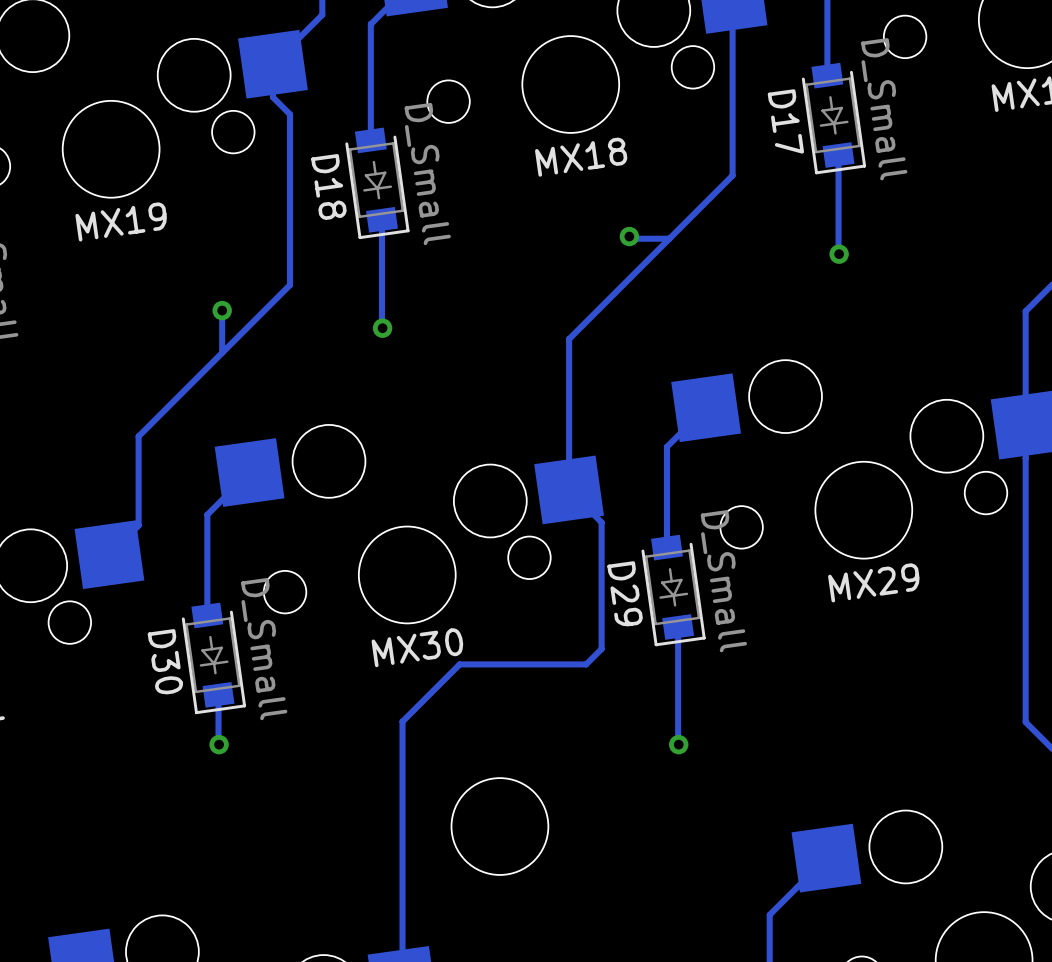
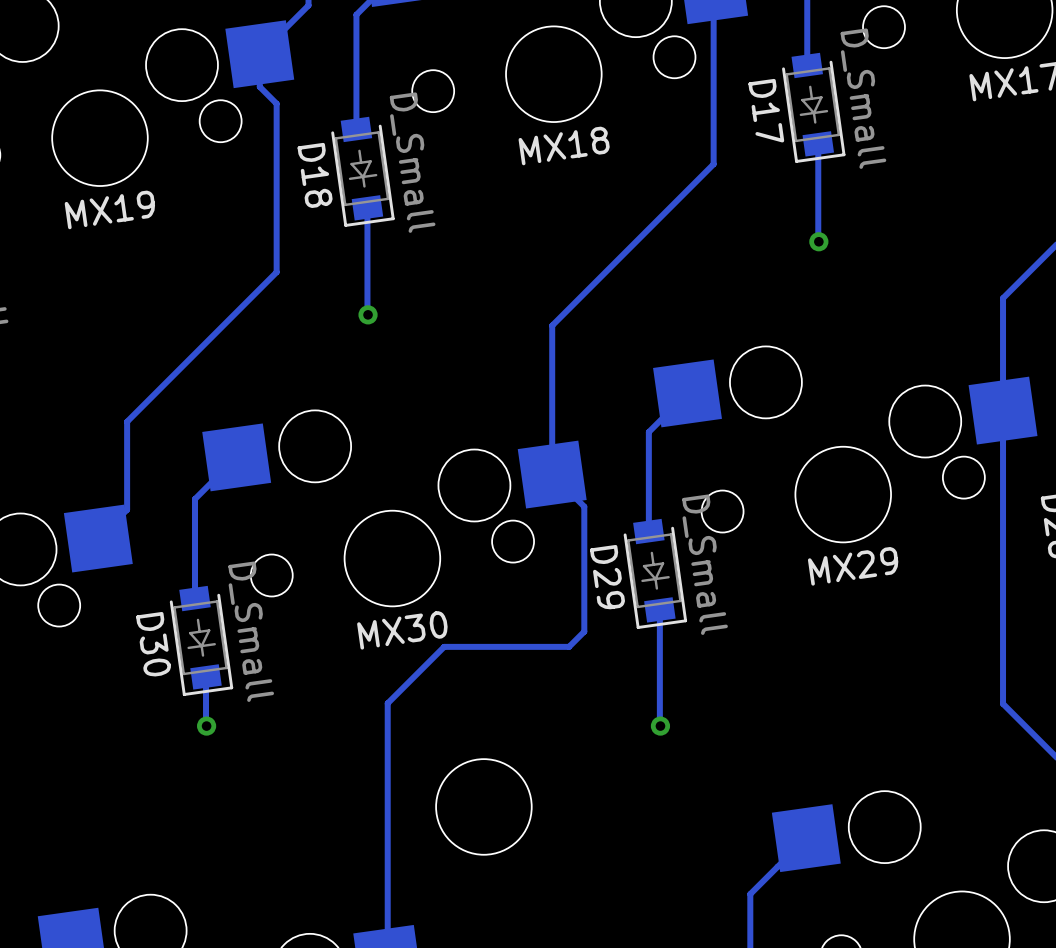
track: (629, 236) (631, 238) (669, 238) -> none
via: (629, 236) -> none
track: (222, 310) (222, 352) -> none
via: (222, 310) -> none

